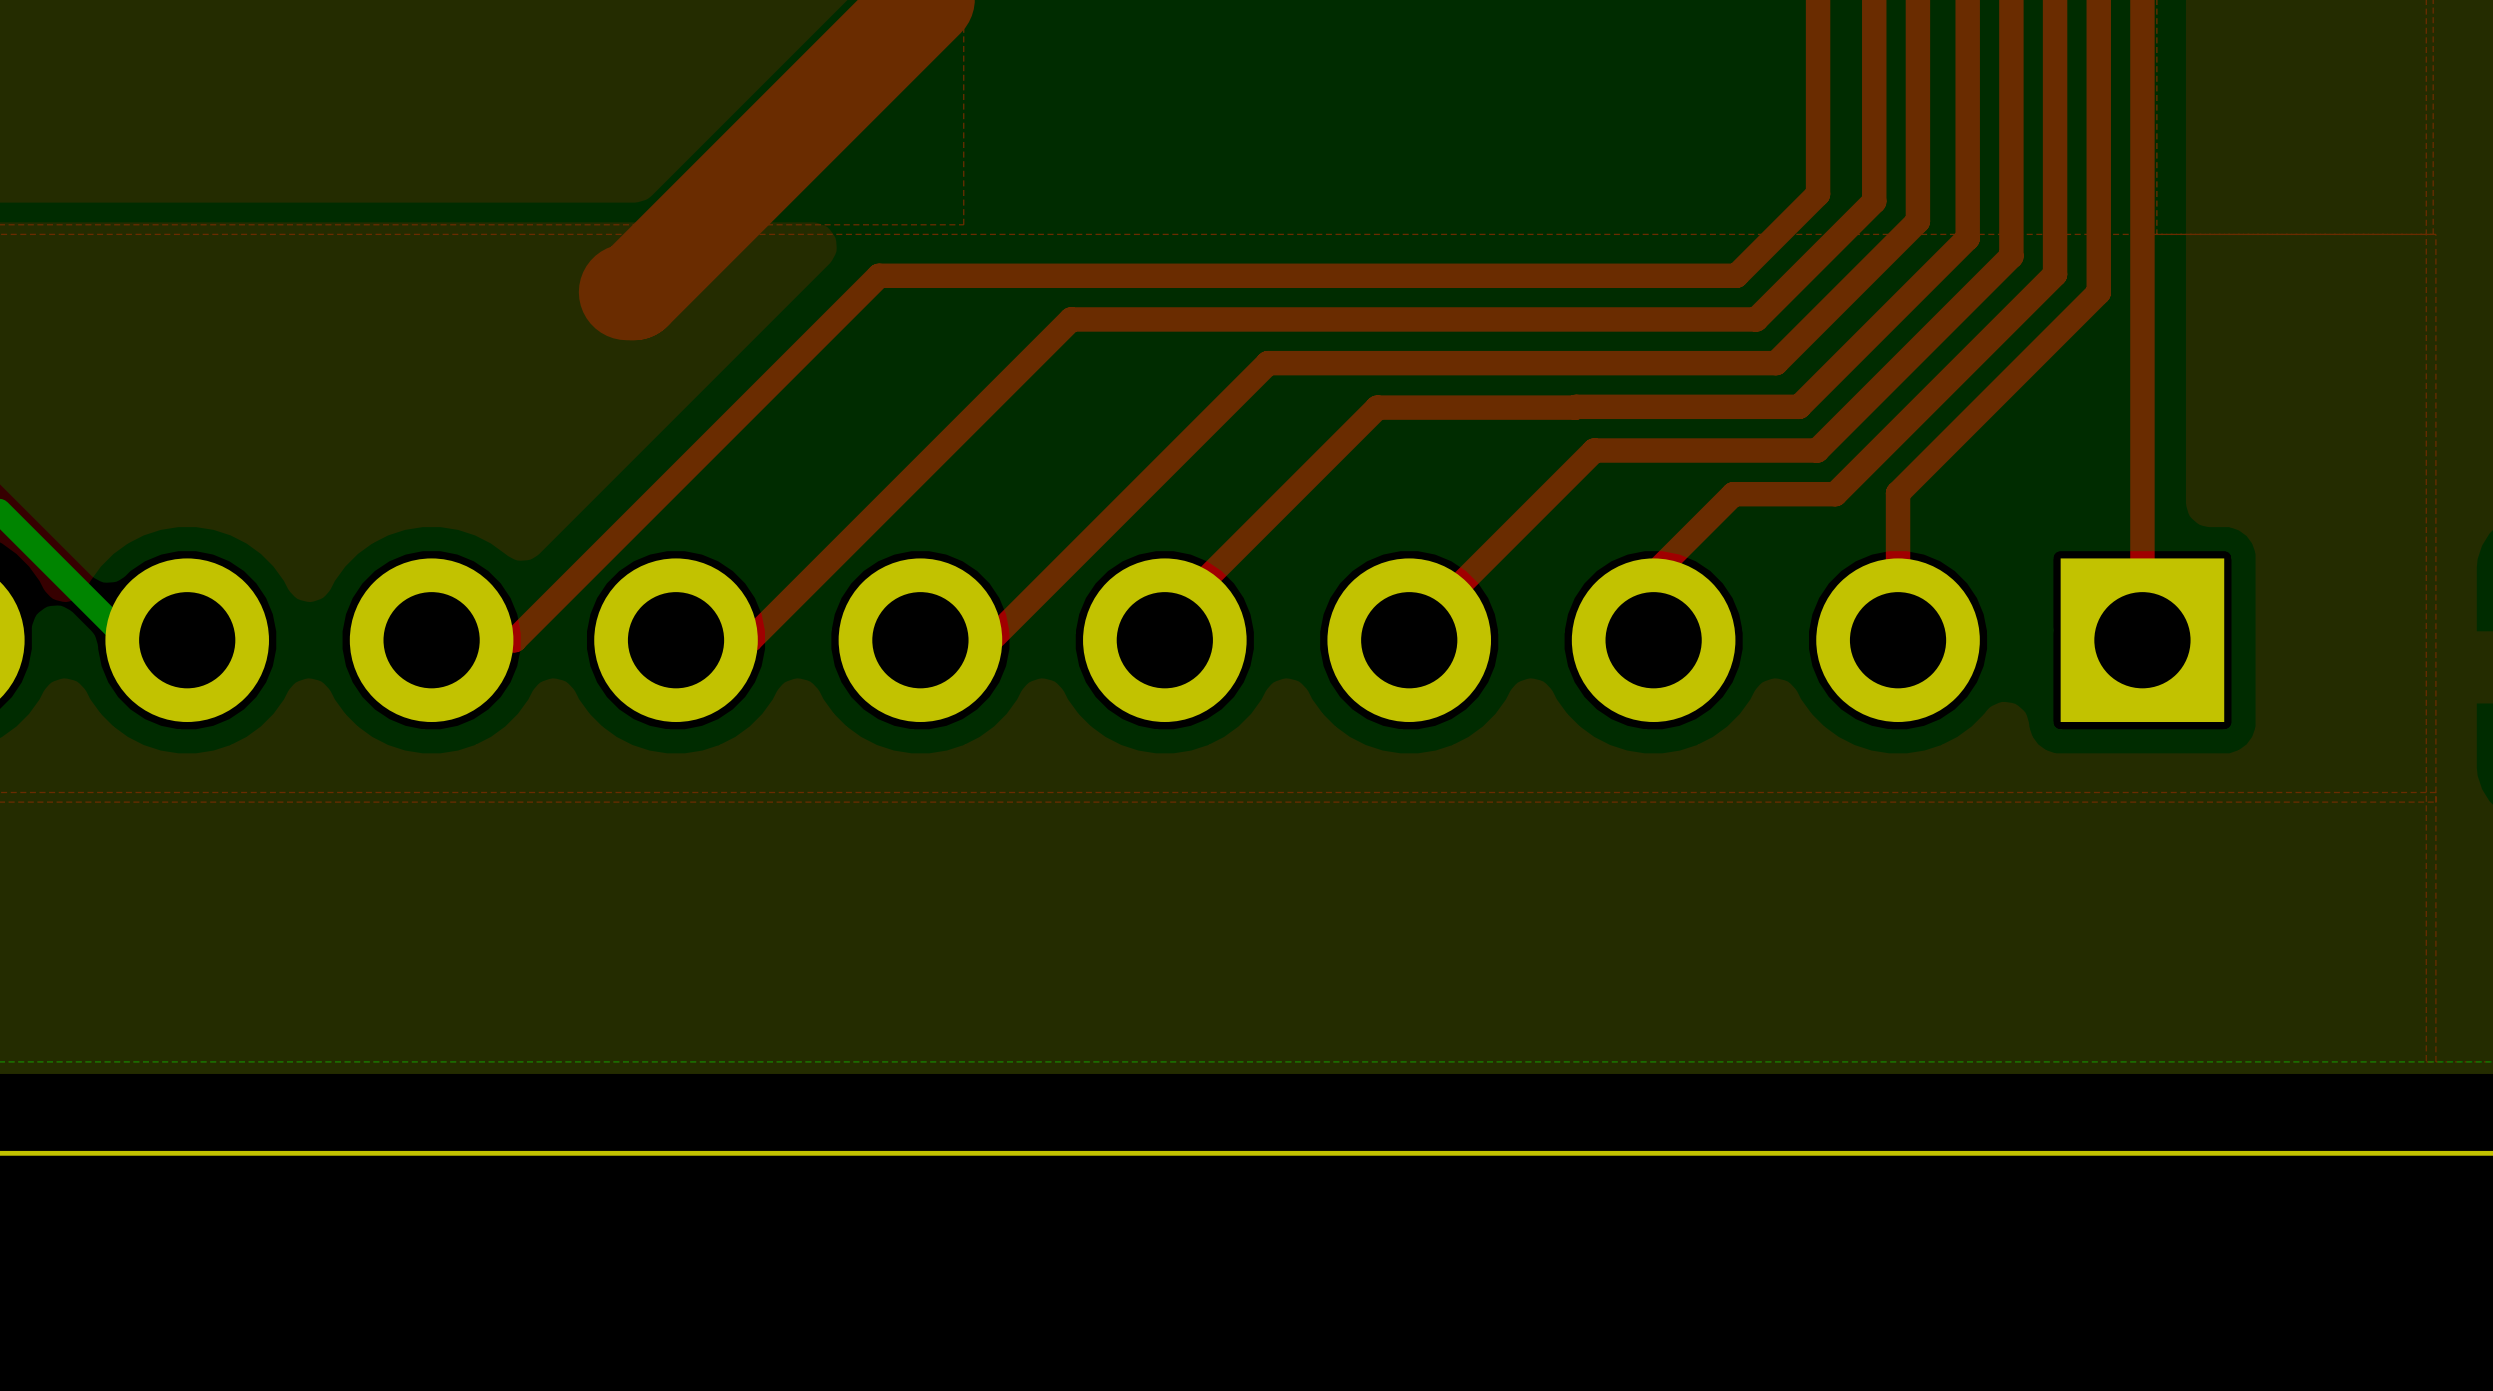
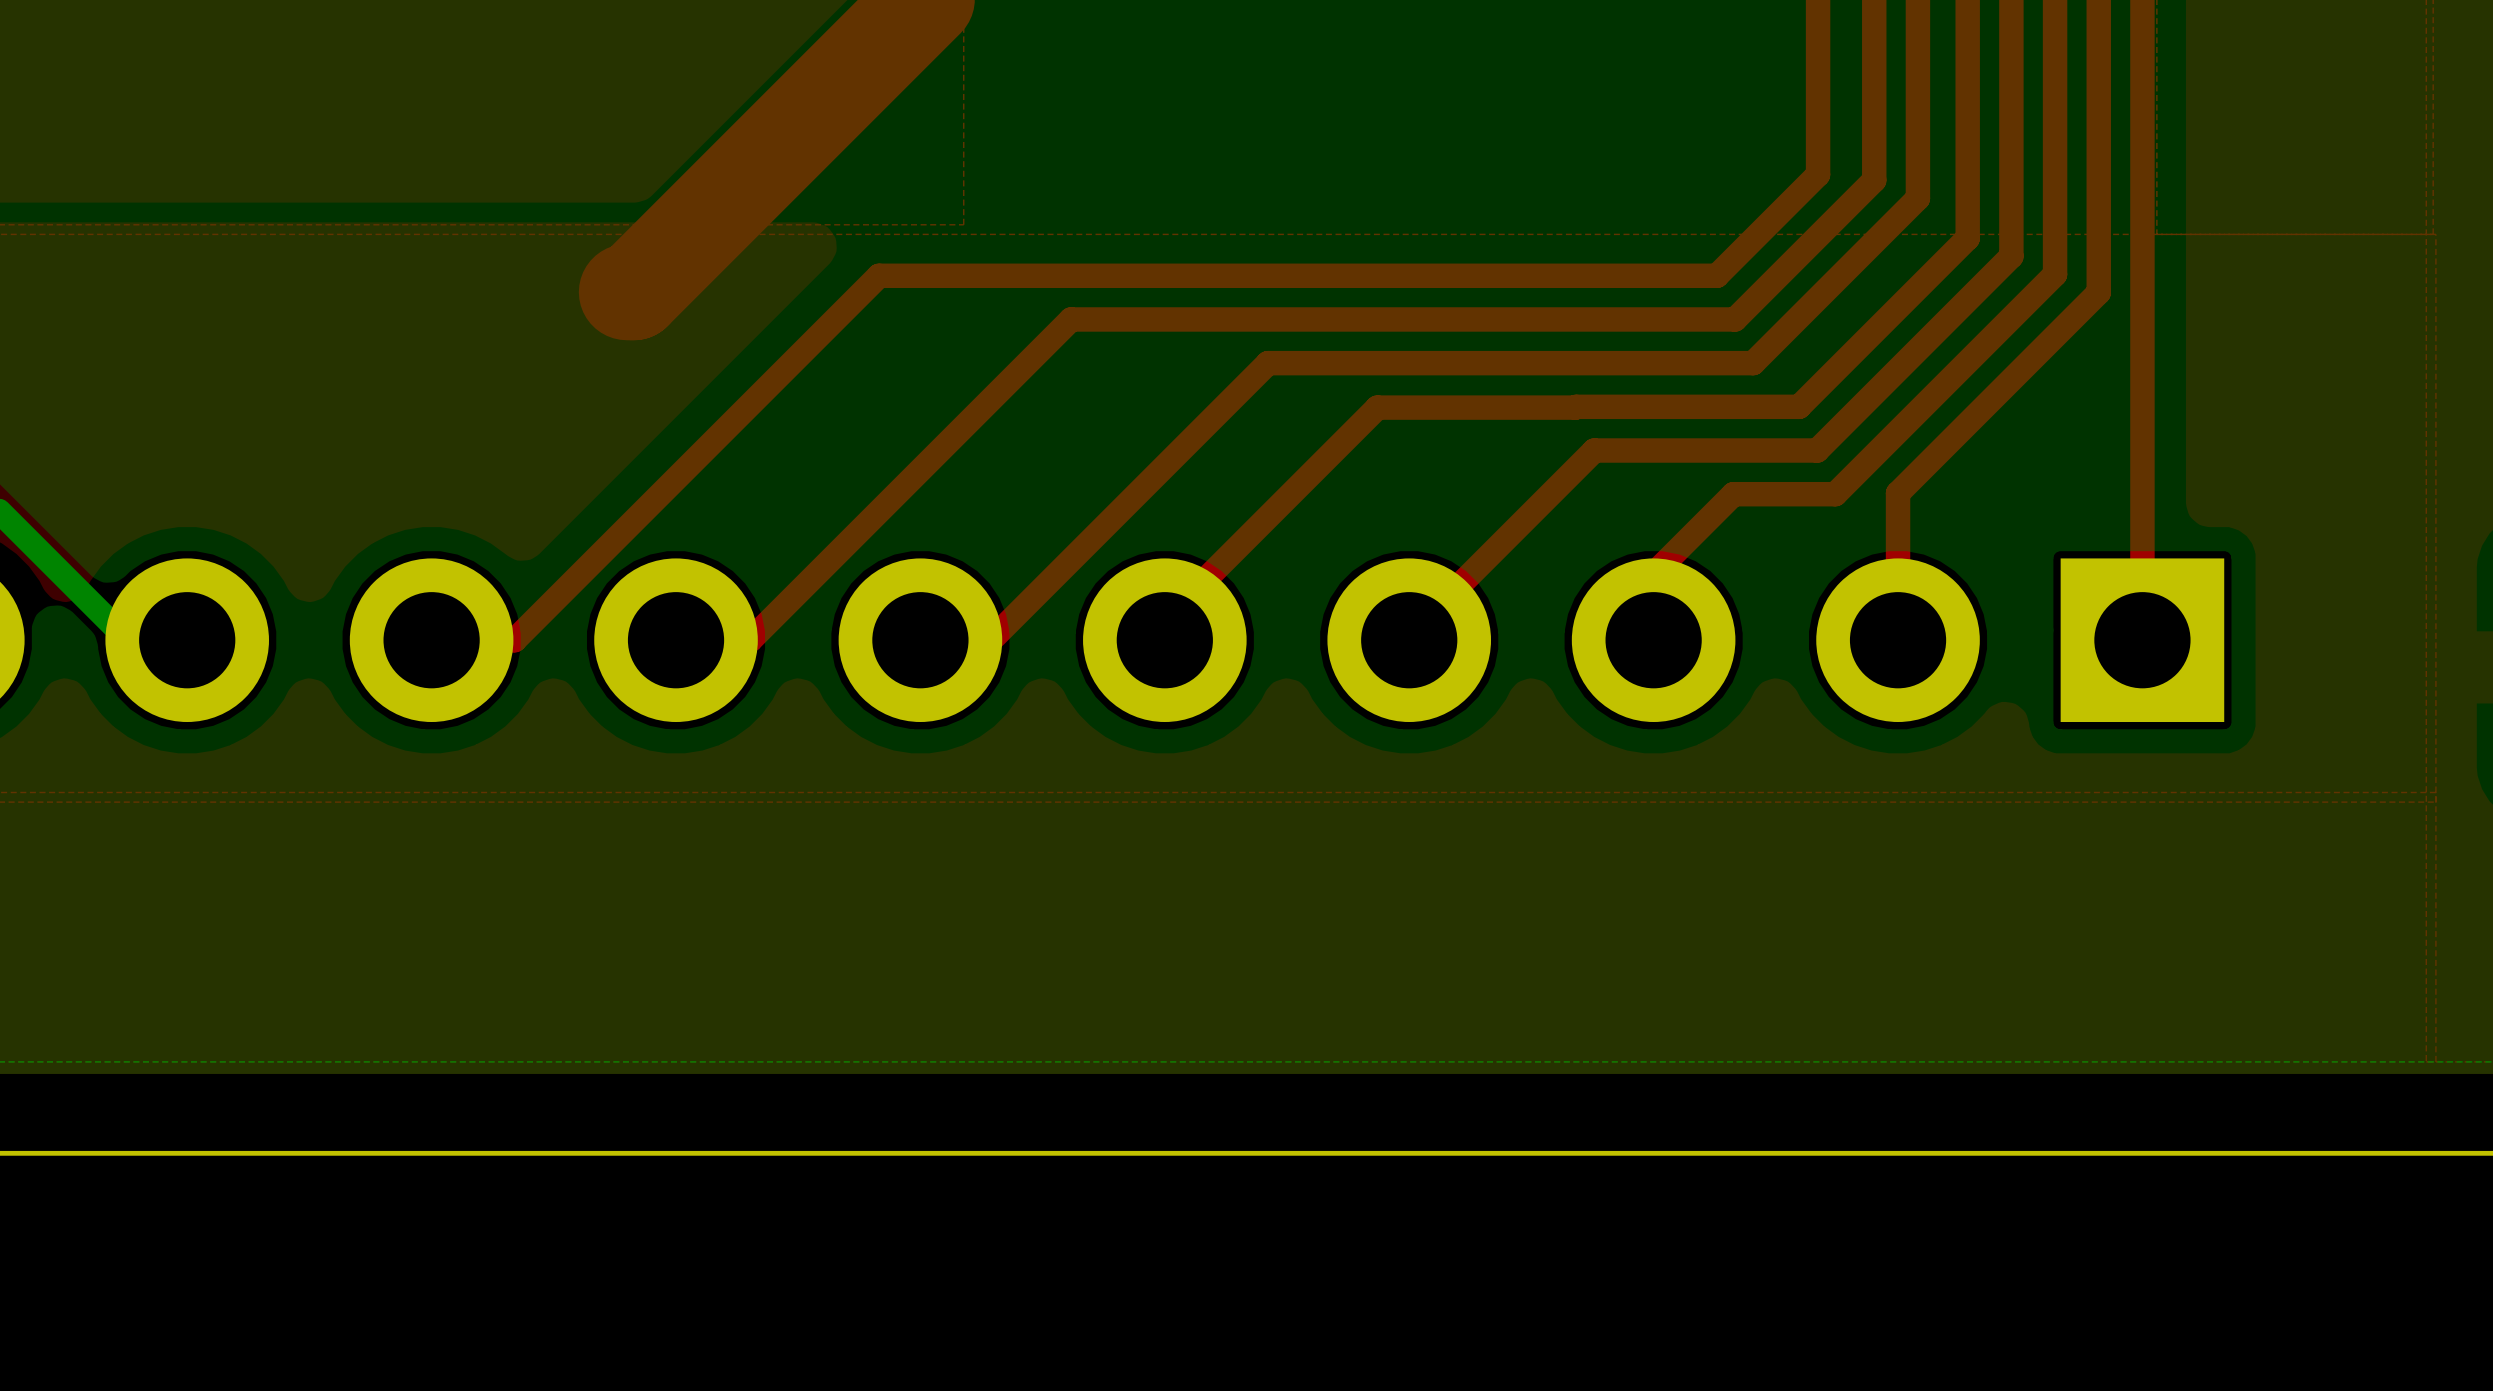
top track: (1818, 174) (1818, 194) (1736, 275) (1716, 275) -> (1818, 174) (1716, 275)
top track: (1874, 180) (1874, 201) (1756, 319) (1735, 319) -> (1874, 180) (1735, 319)
top track: (1917, 198) (1917, 221) (1776, 363) (1753, 363) -> (1917, 198) (1753, 363)

